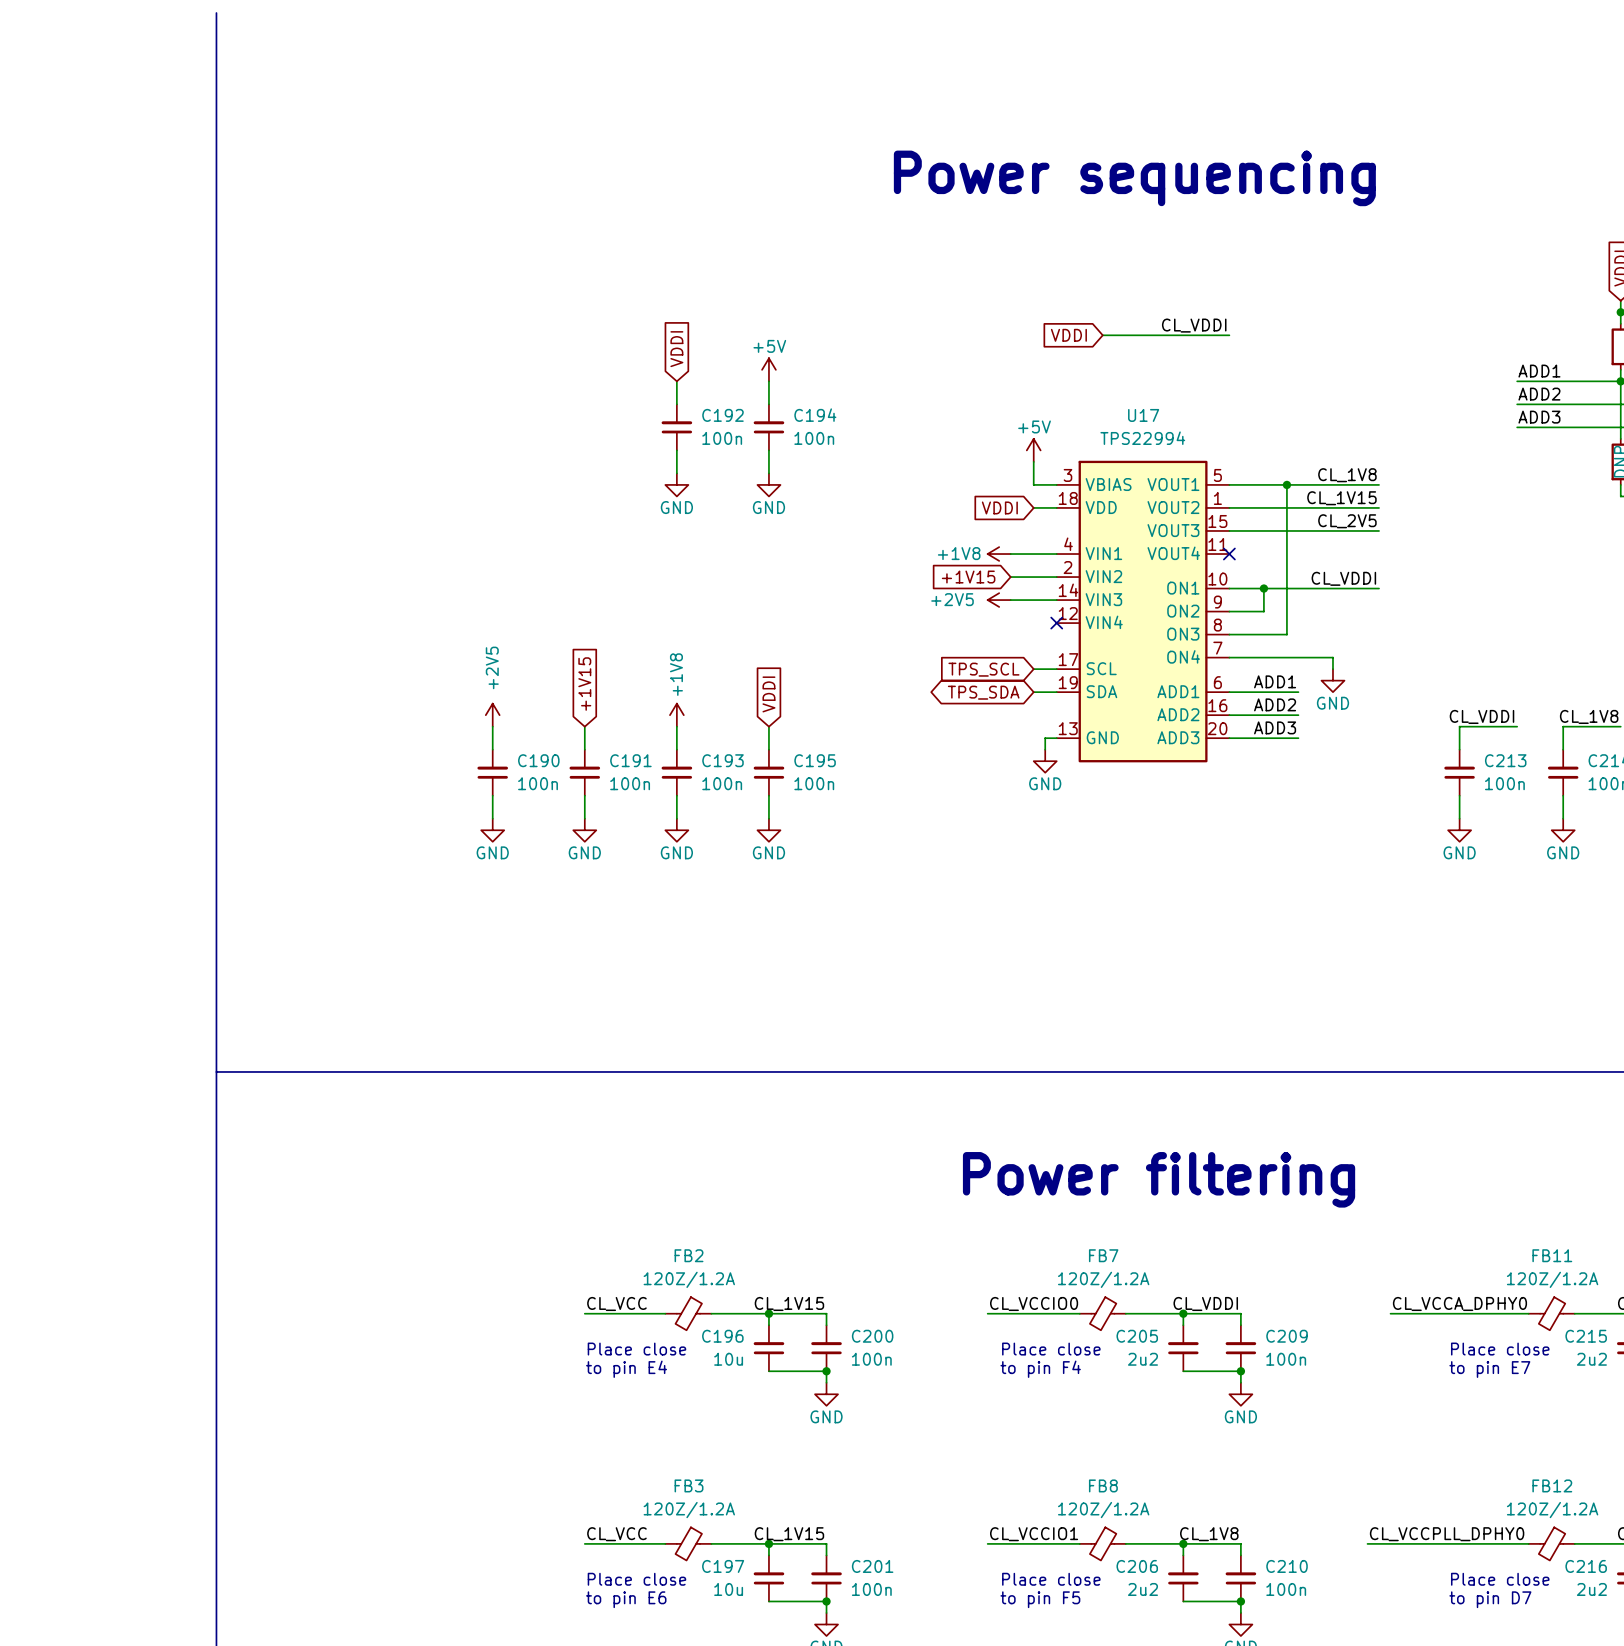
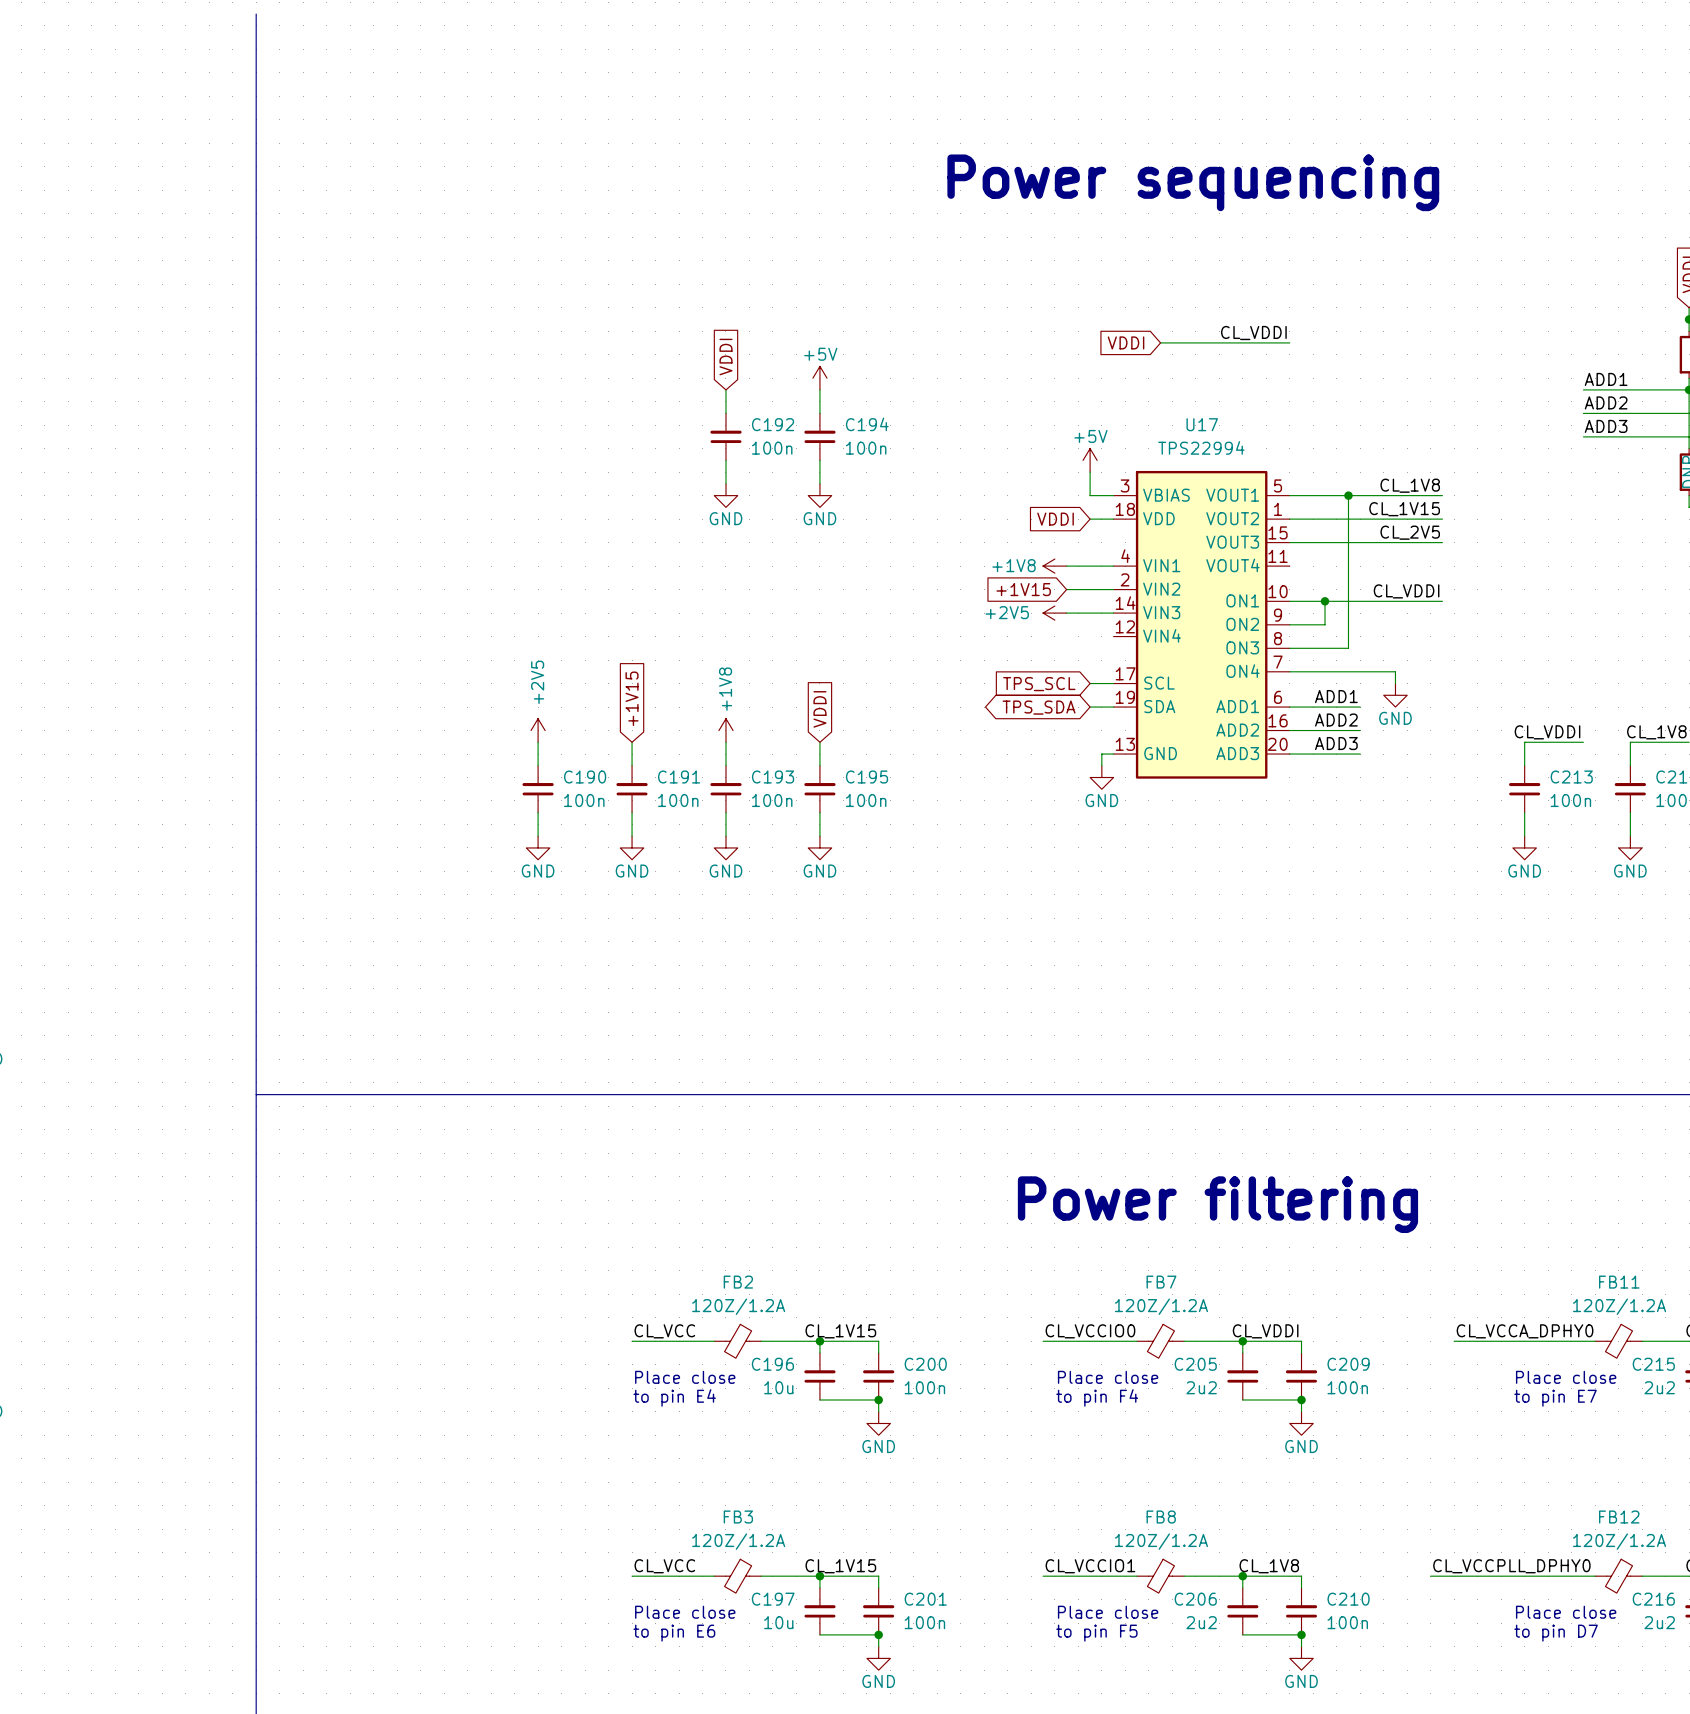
no-connect mark: (1229, 554) -> none
no-connect mark: (1056, 623) -> none

